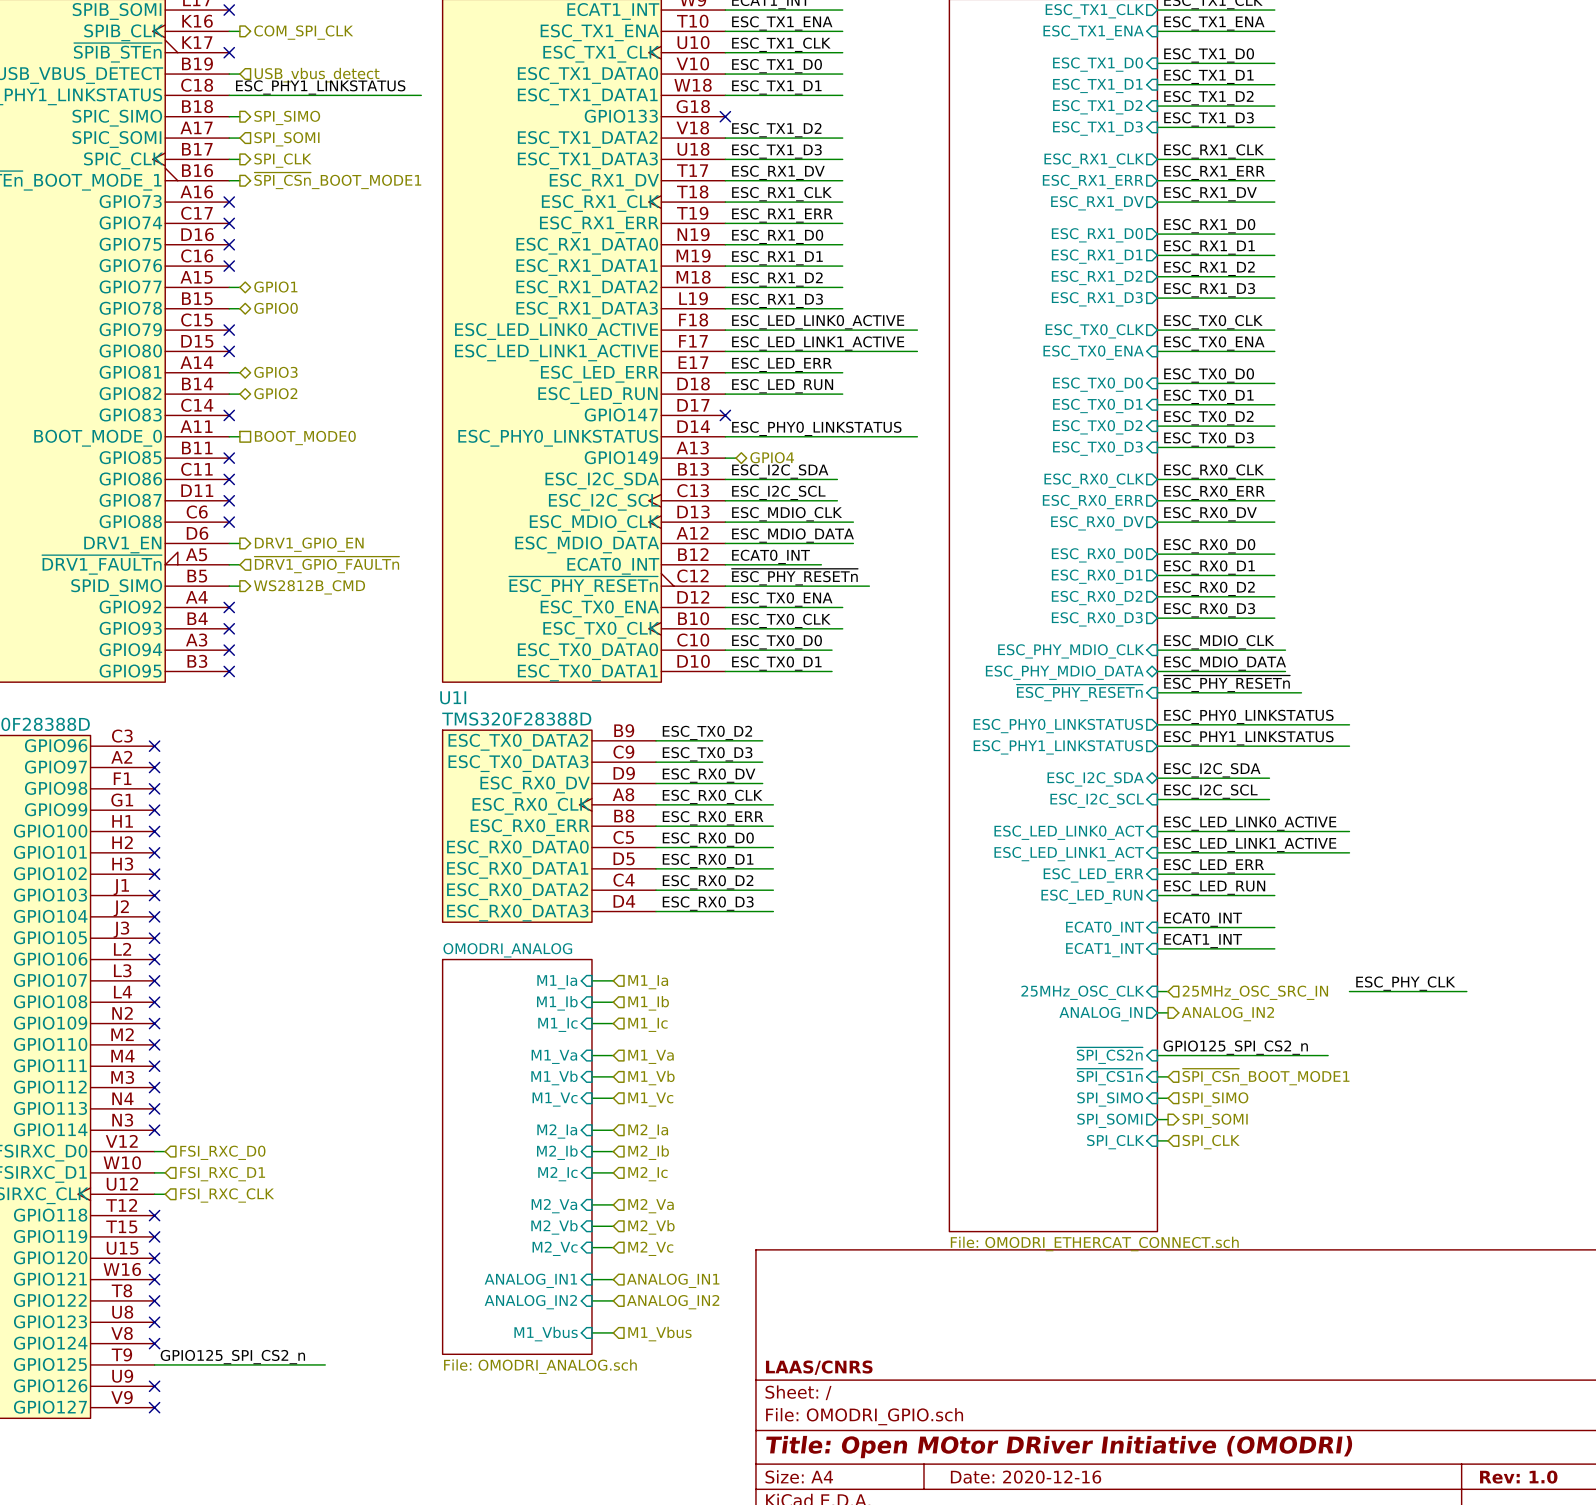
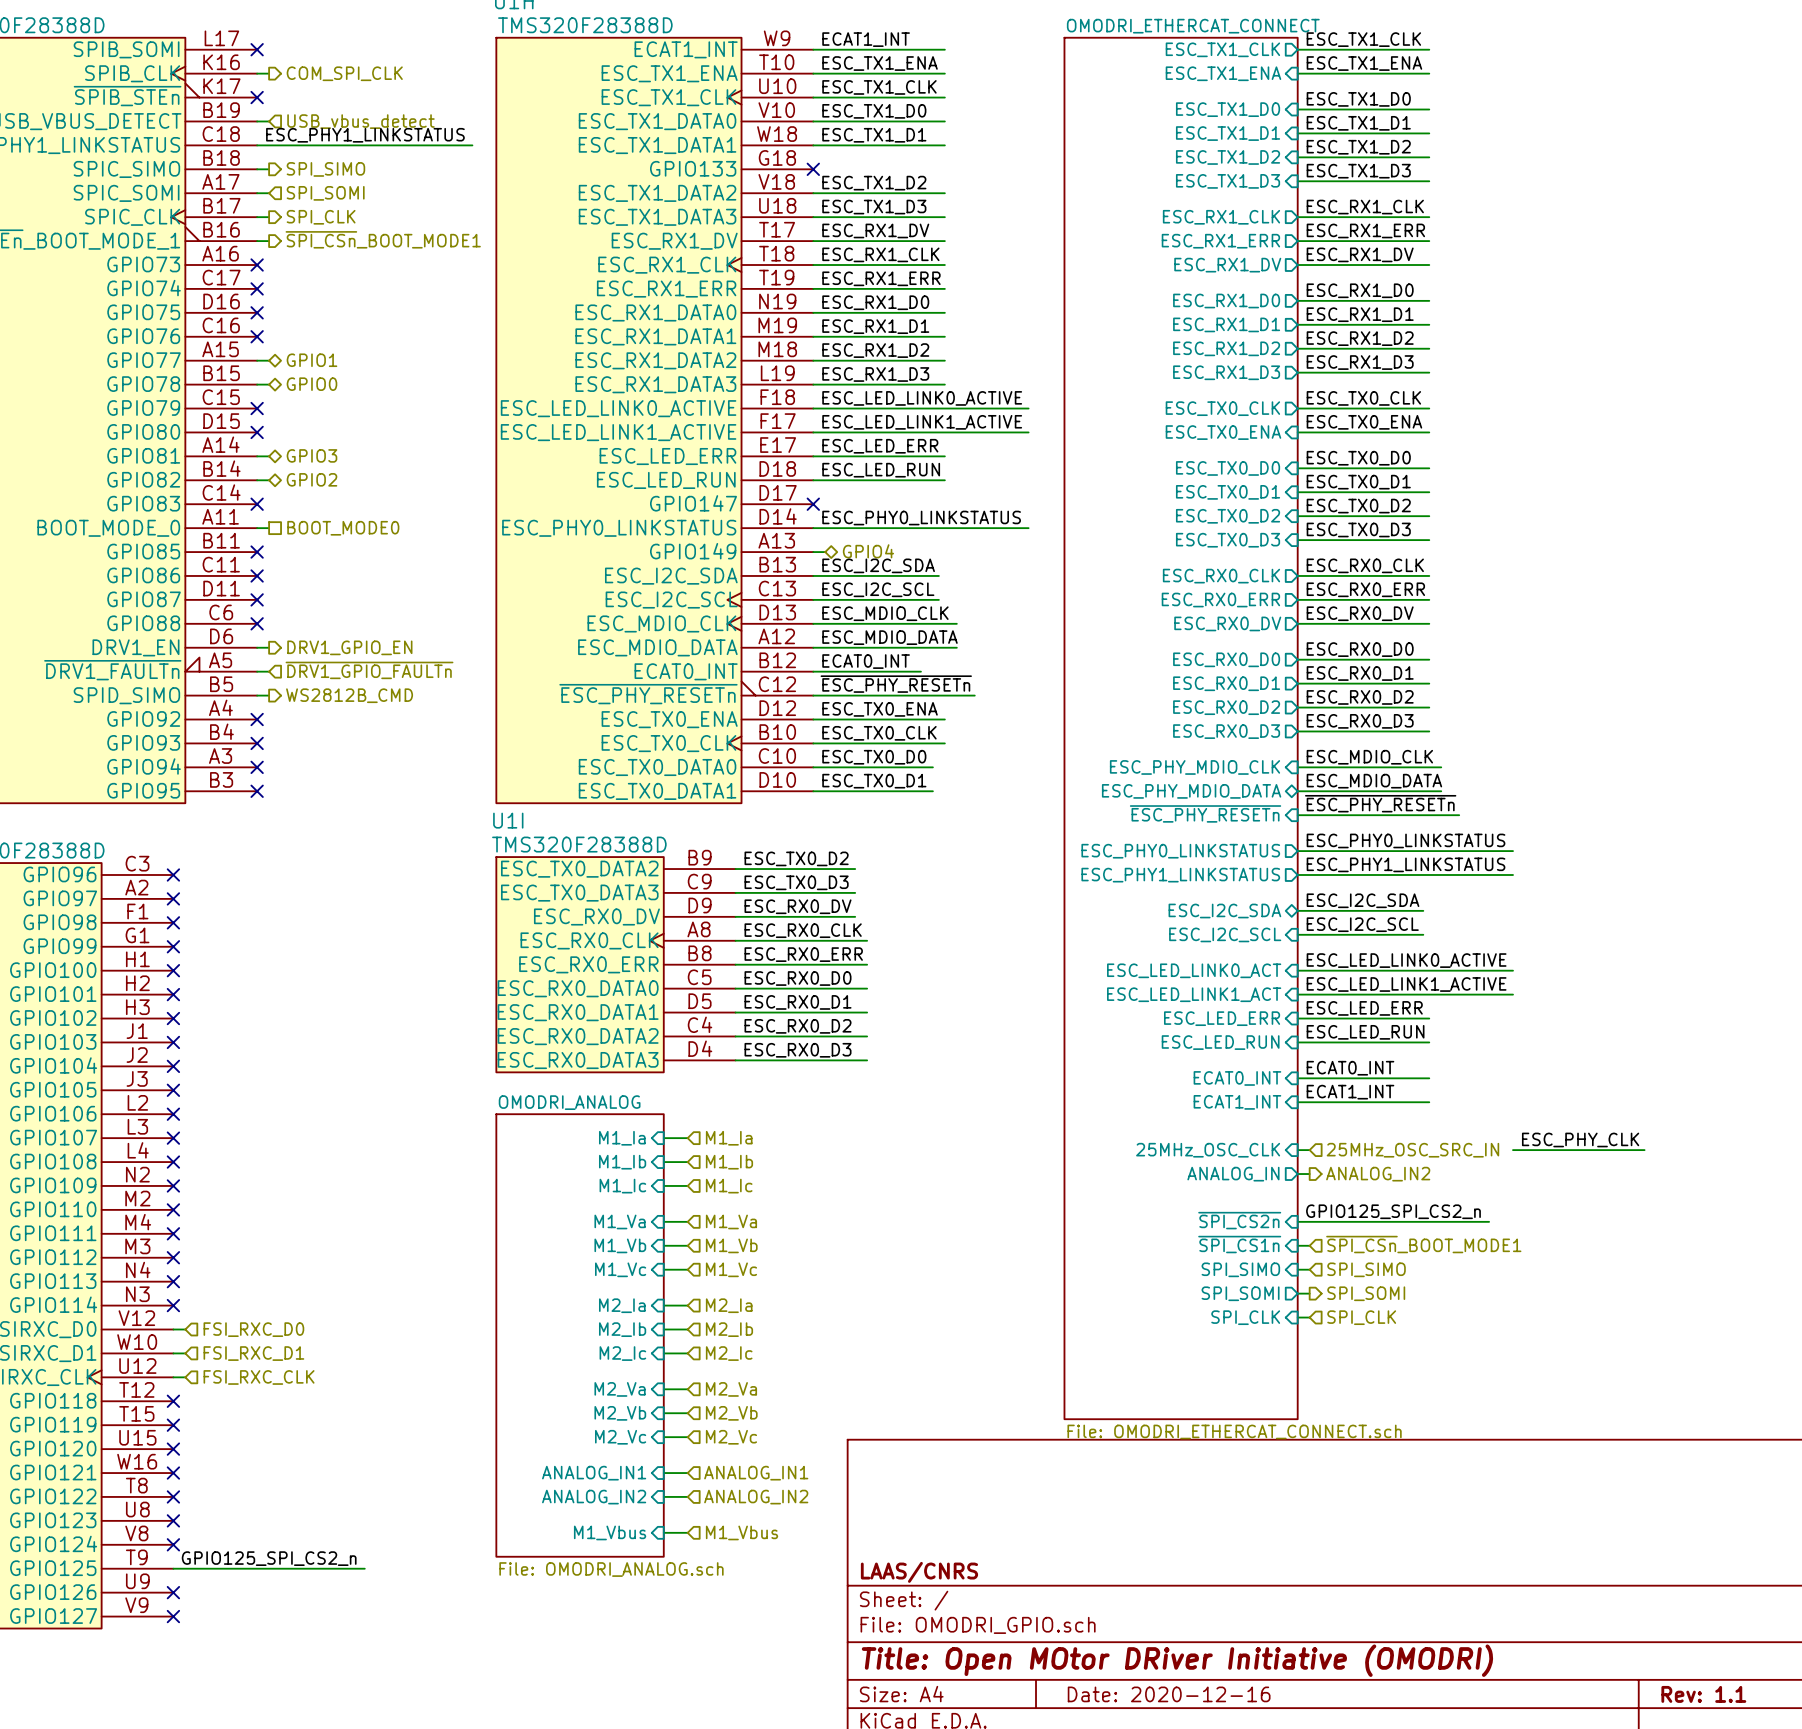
title block: Rev: 1.0 (1518, 1477) -> Rev: 1.1 (1703, 1694)

